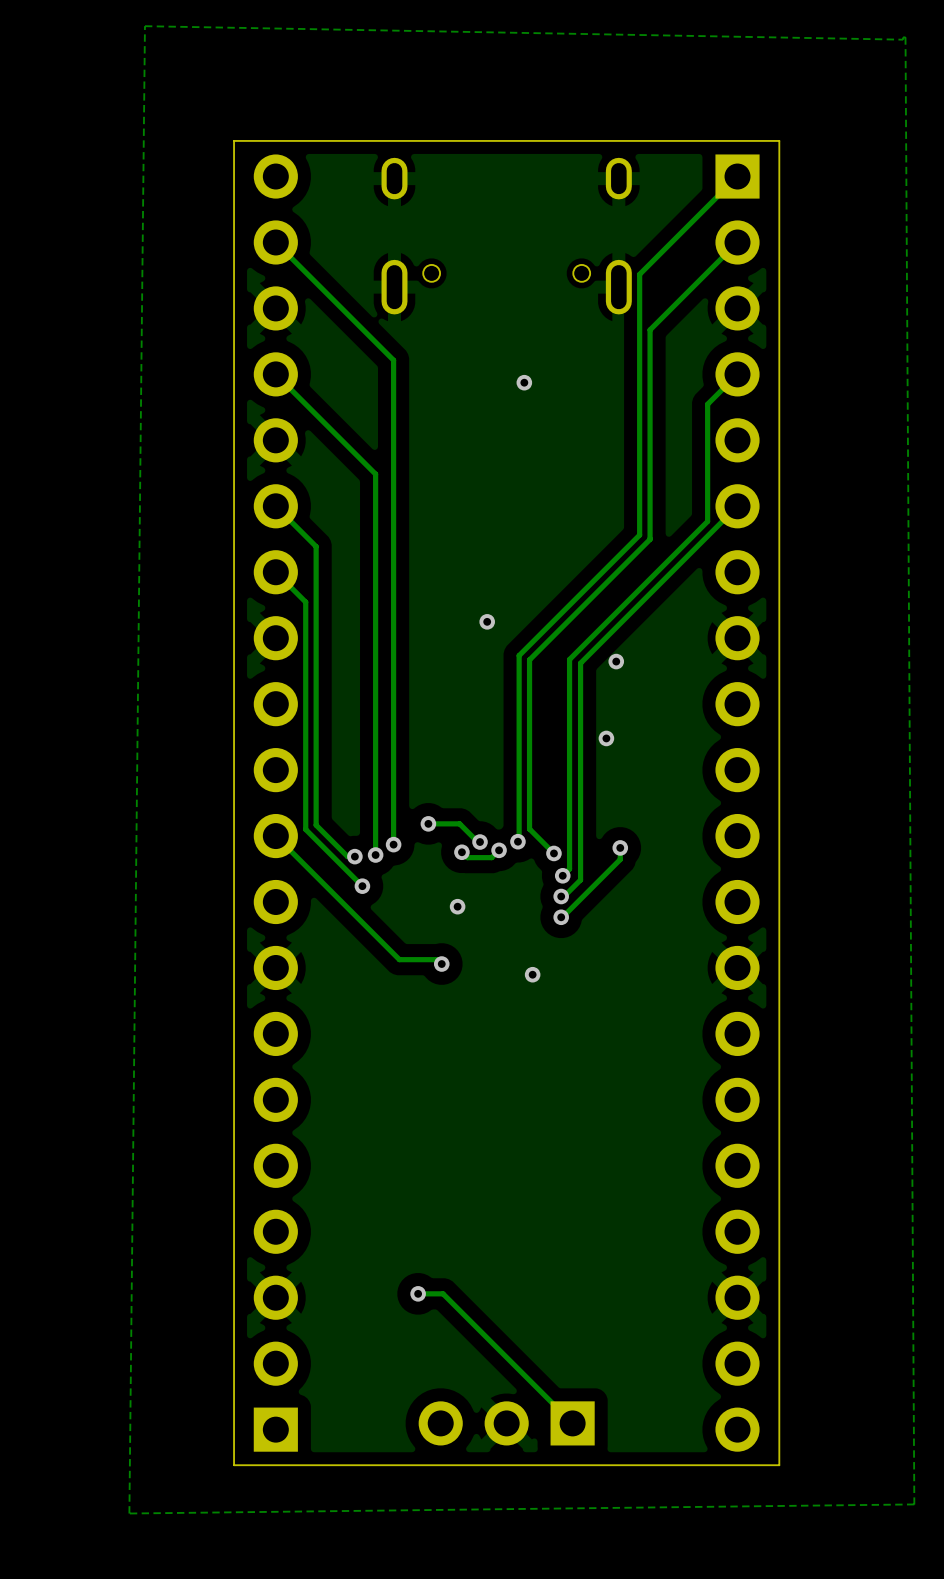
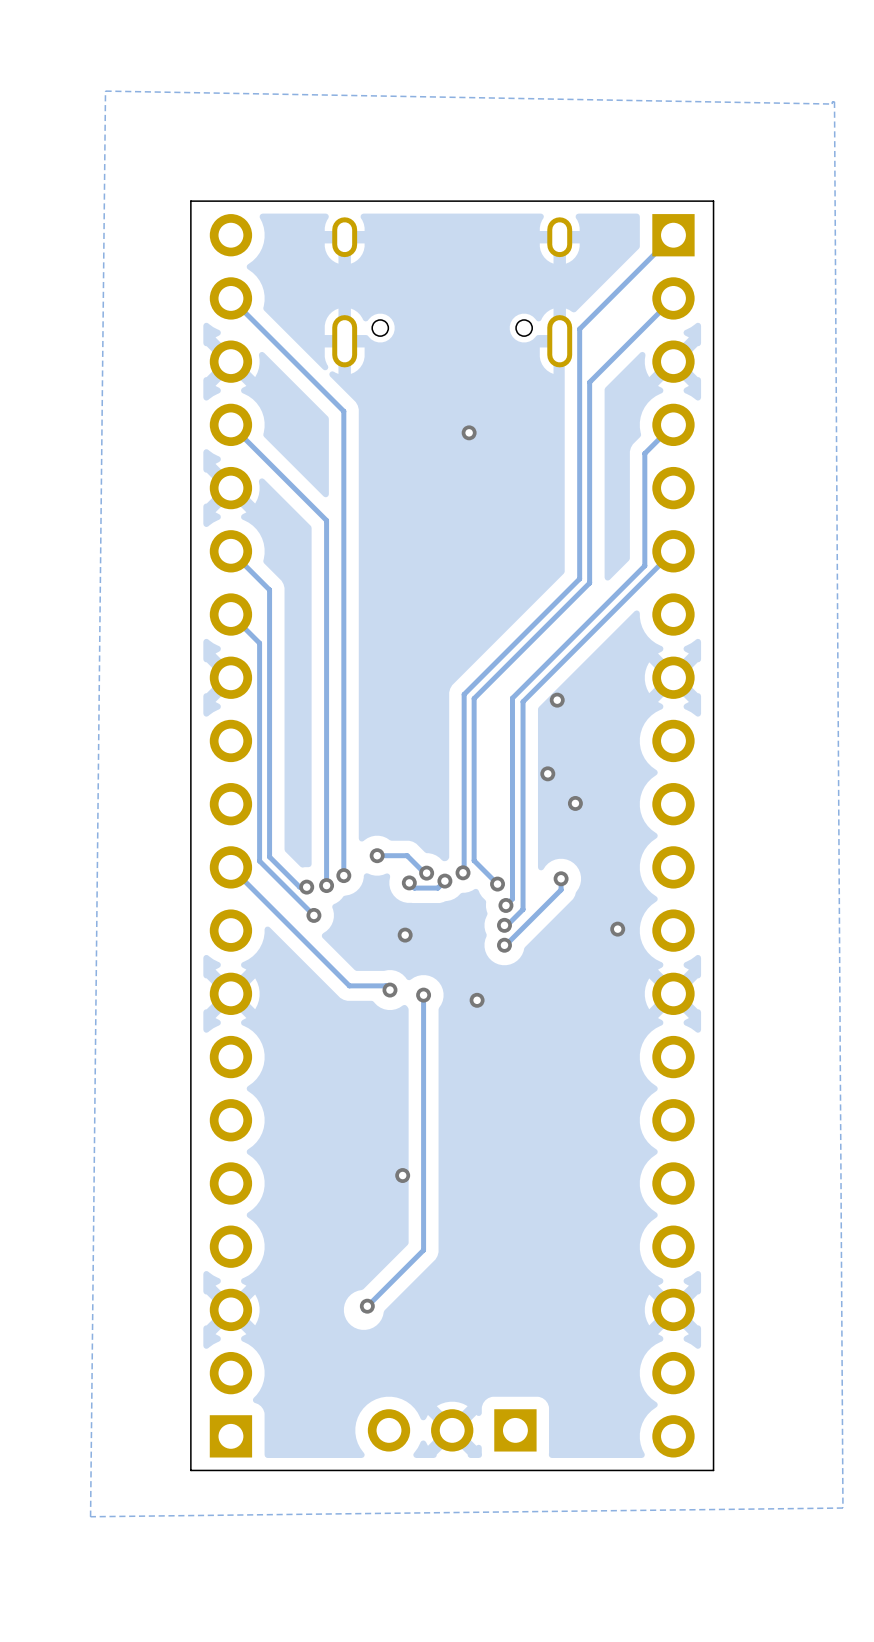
via: (487, 621) -> none
via: none -> (575, 803)
via: none -> (617, 929)
track: none -> (423, 995) (423, 1250) (363, 1309)
via: none -> (423, 995)
via: none -> (402, 1175)
track: (418, 1293) (443, 1293) (572, 1423) -> none

